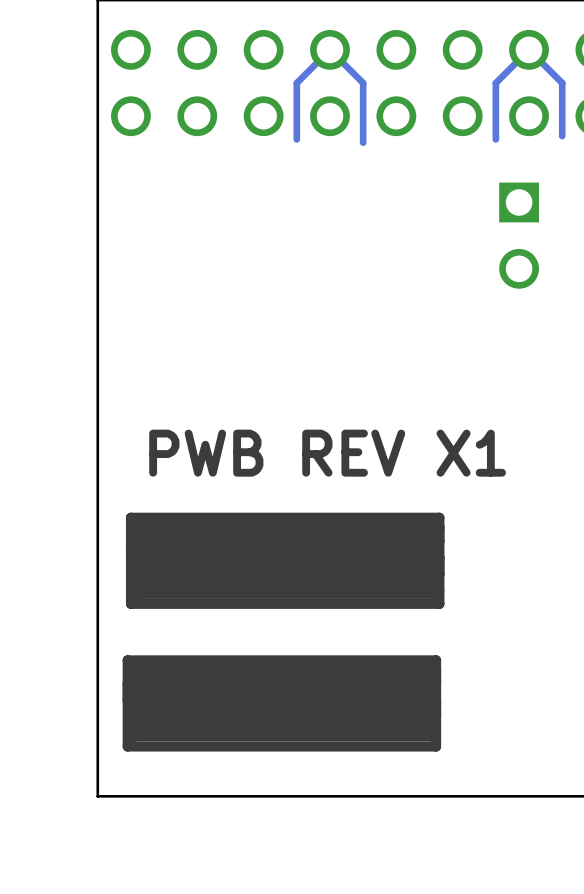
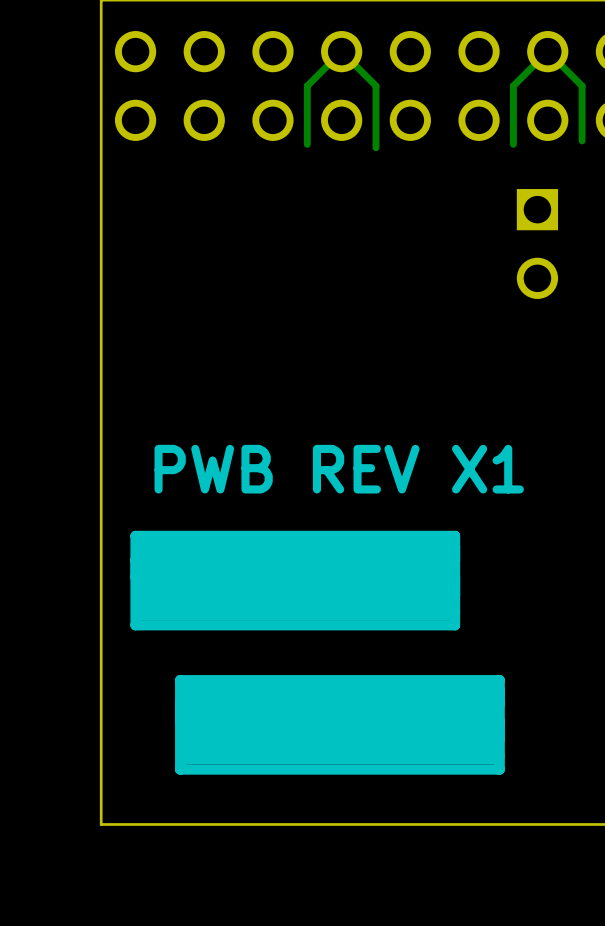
drawing position: (281, 703) -> (339, 724)

